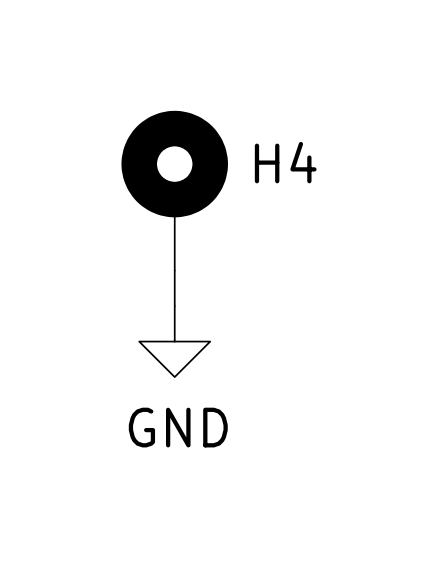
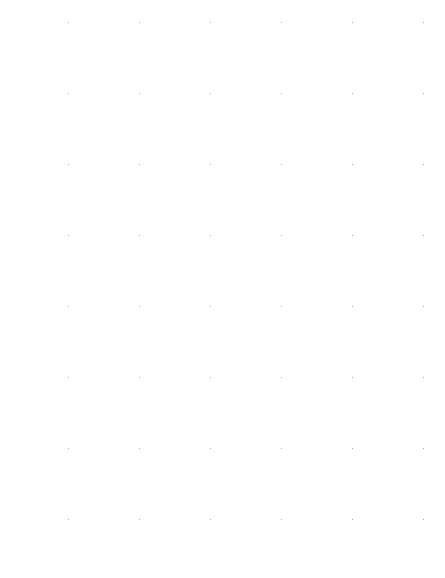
H4: (174, 190) -> none
wire: (174, 270) (174, 306) -> none
power symbol: GND (174, 341) -> none

